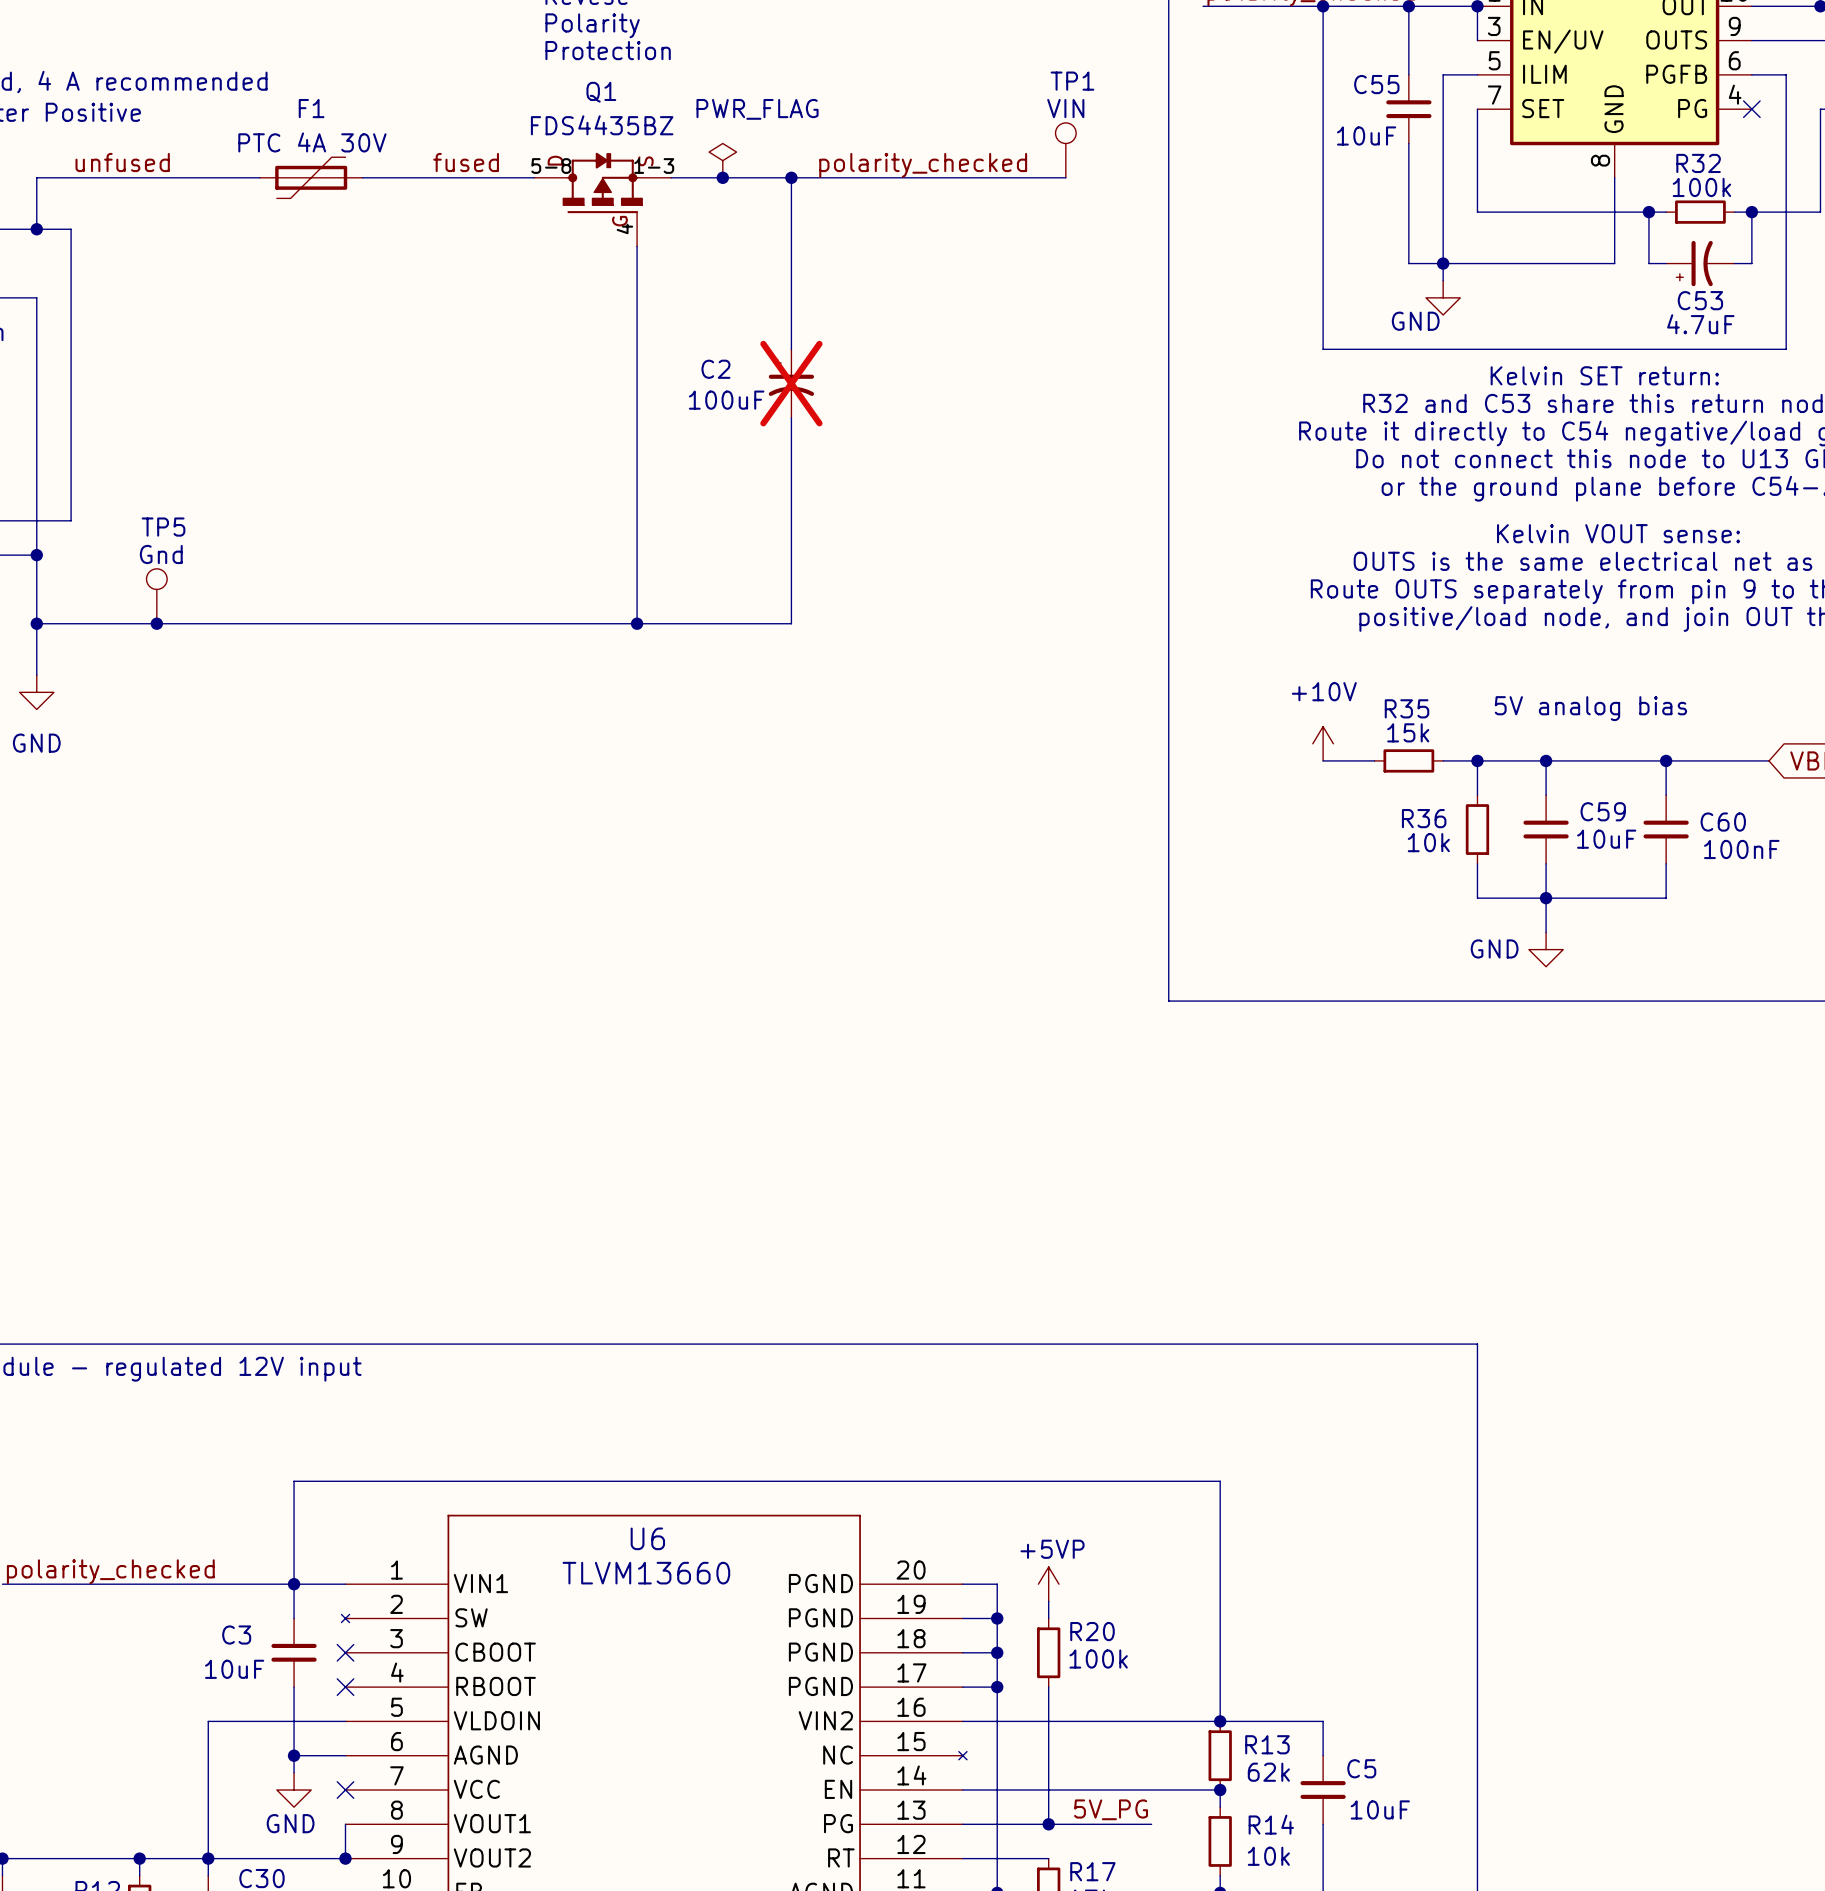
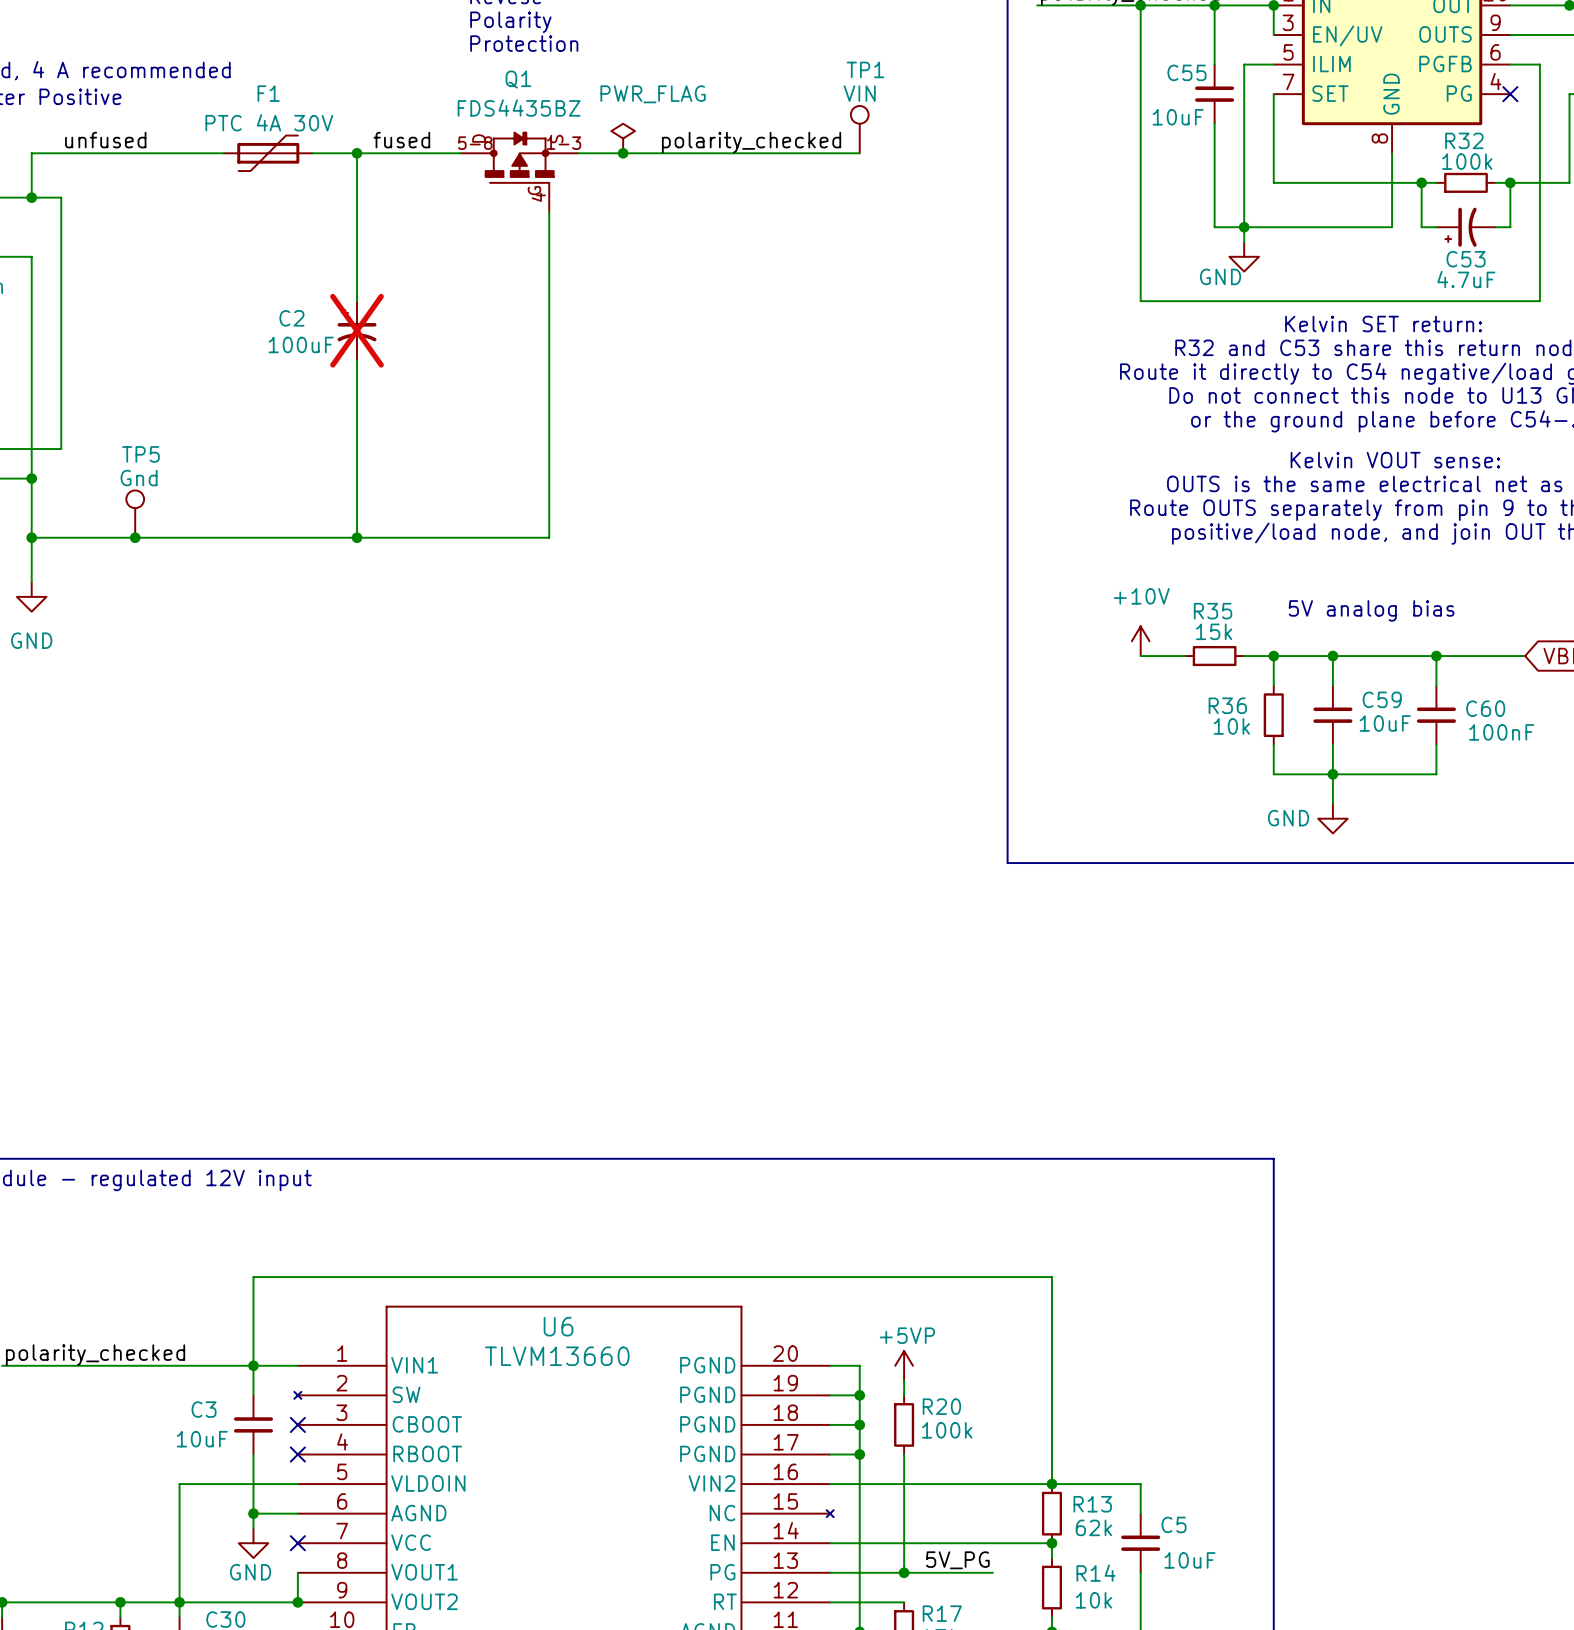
TP1 position: (1065, 150) -> (859, 129)
label position: polarity_checked (923, 165) -> polarity_checked (751, 142)
wire: none -> (357, 153) (357, 301)
junction: none -> (357, 153)
wire: (791, 177) (791, 349) -> none
junction: (791, 177) -> none
wire: (997, 177) (1065, 177) -> none
C2 position: (791, 383) -> (357, 330)
wire: none -> (357, 360) (357, 537)
wire: (791, 417) (791, 623) (637, 623) -> none
junction: none -> (357, 537)
junction: (637, 623) -> none

